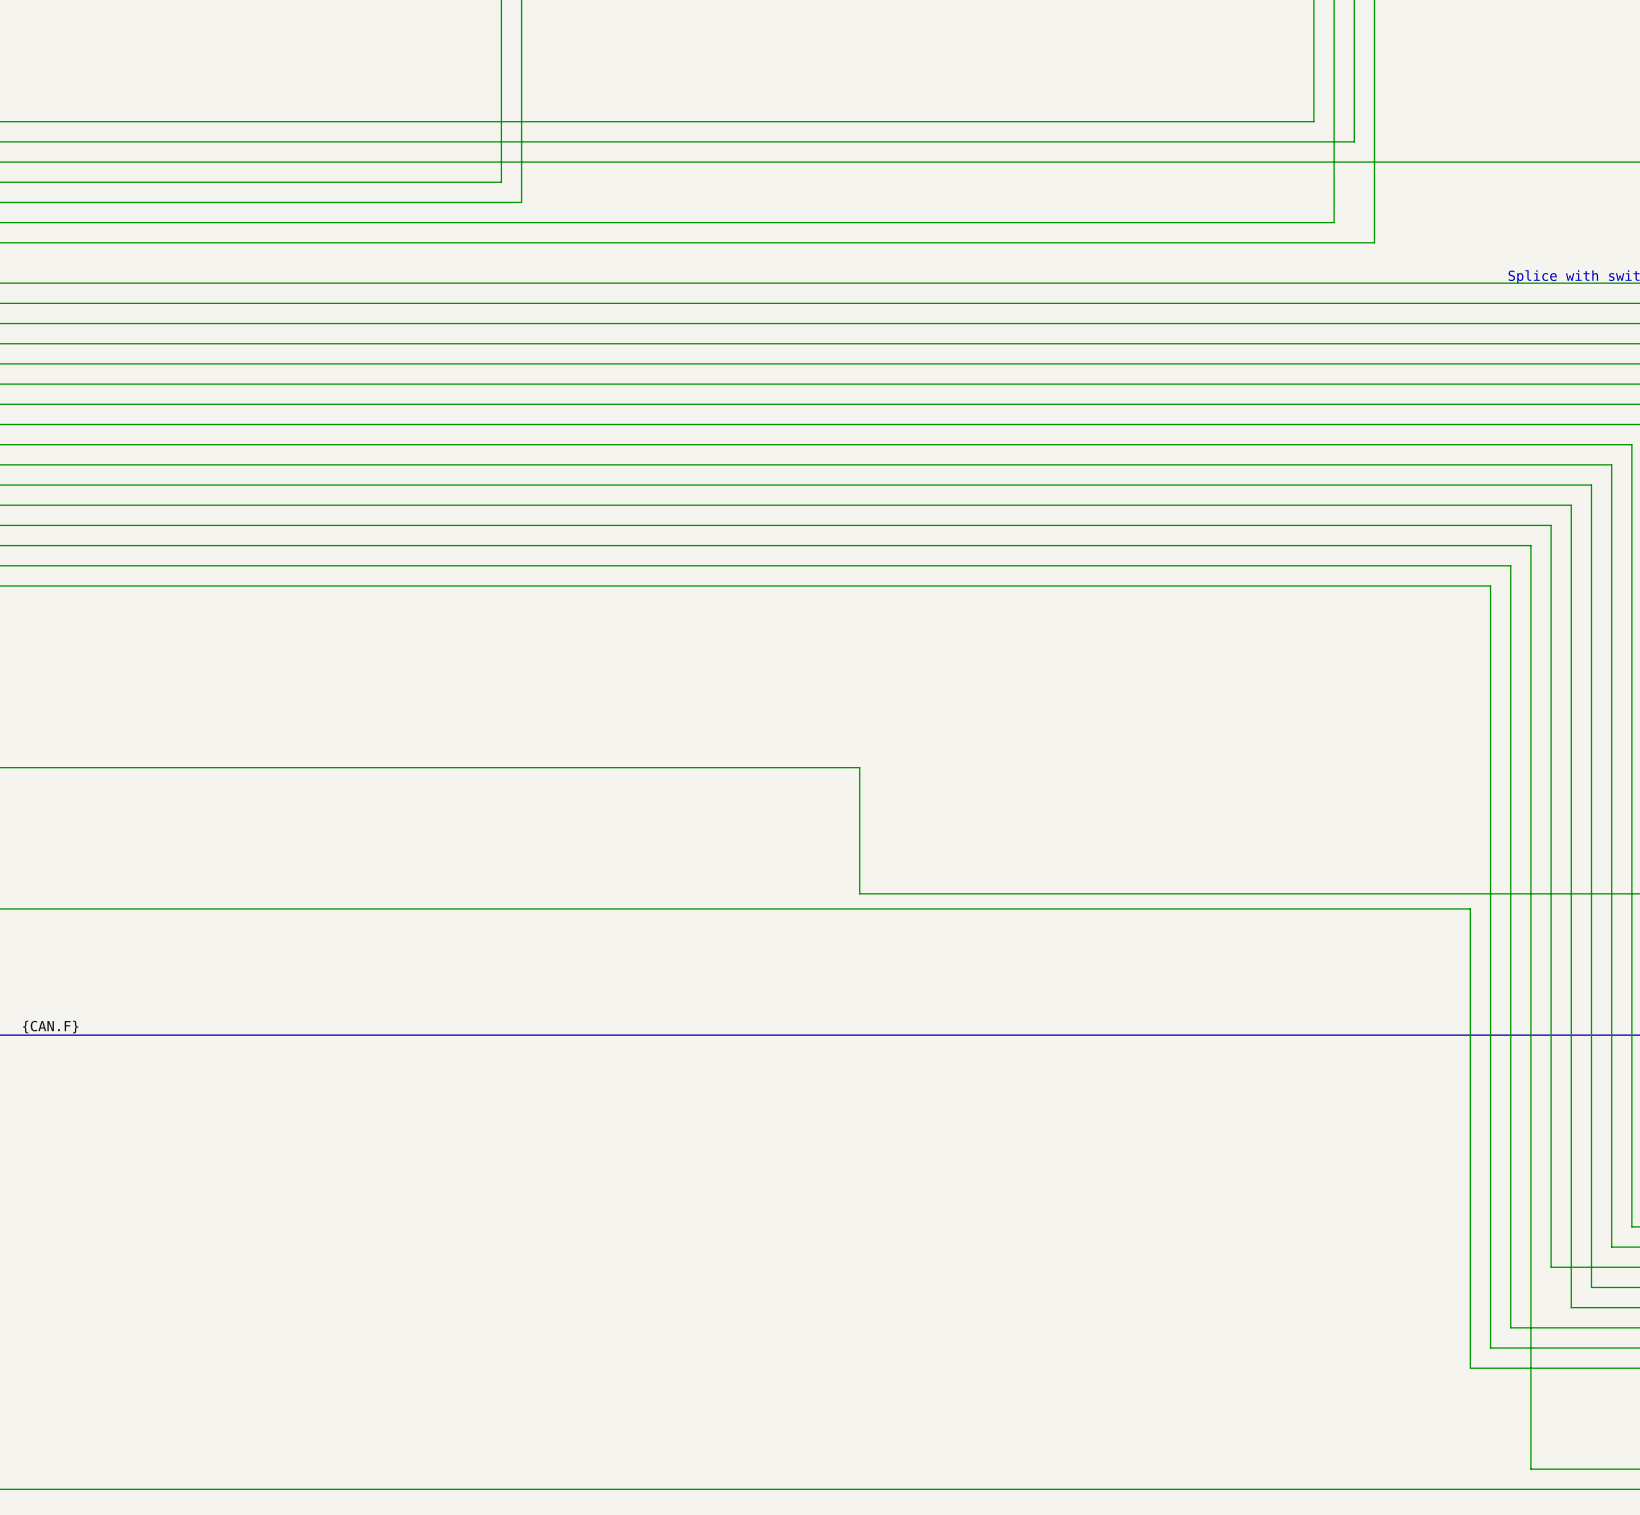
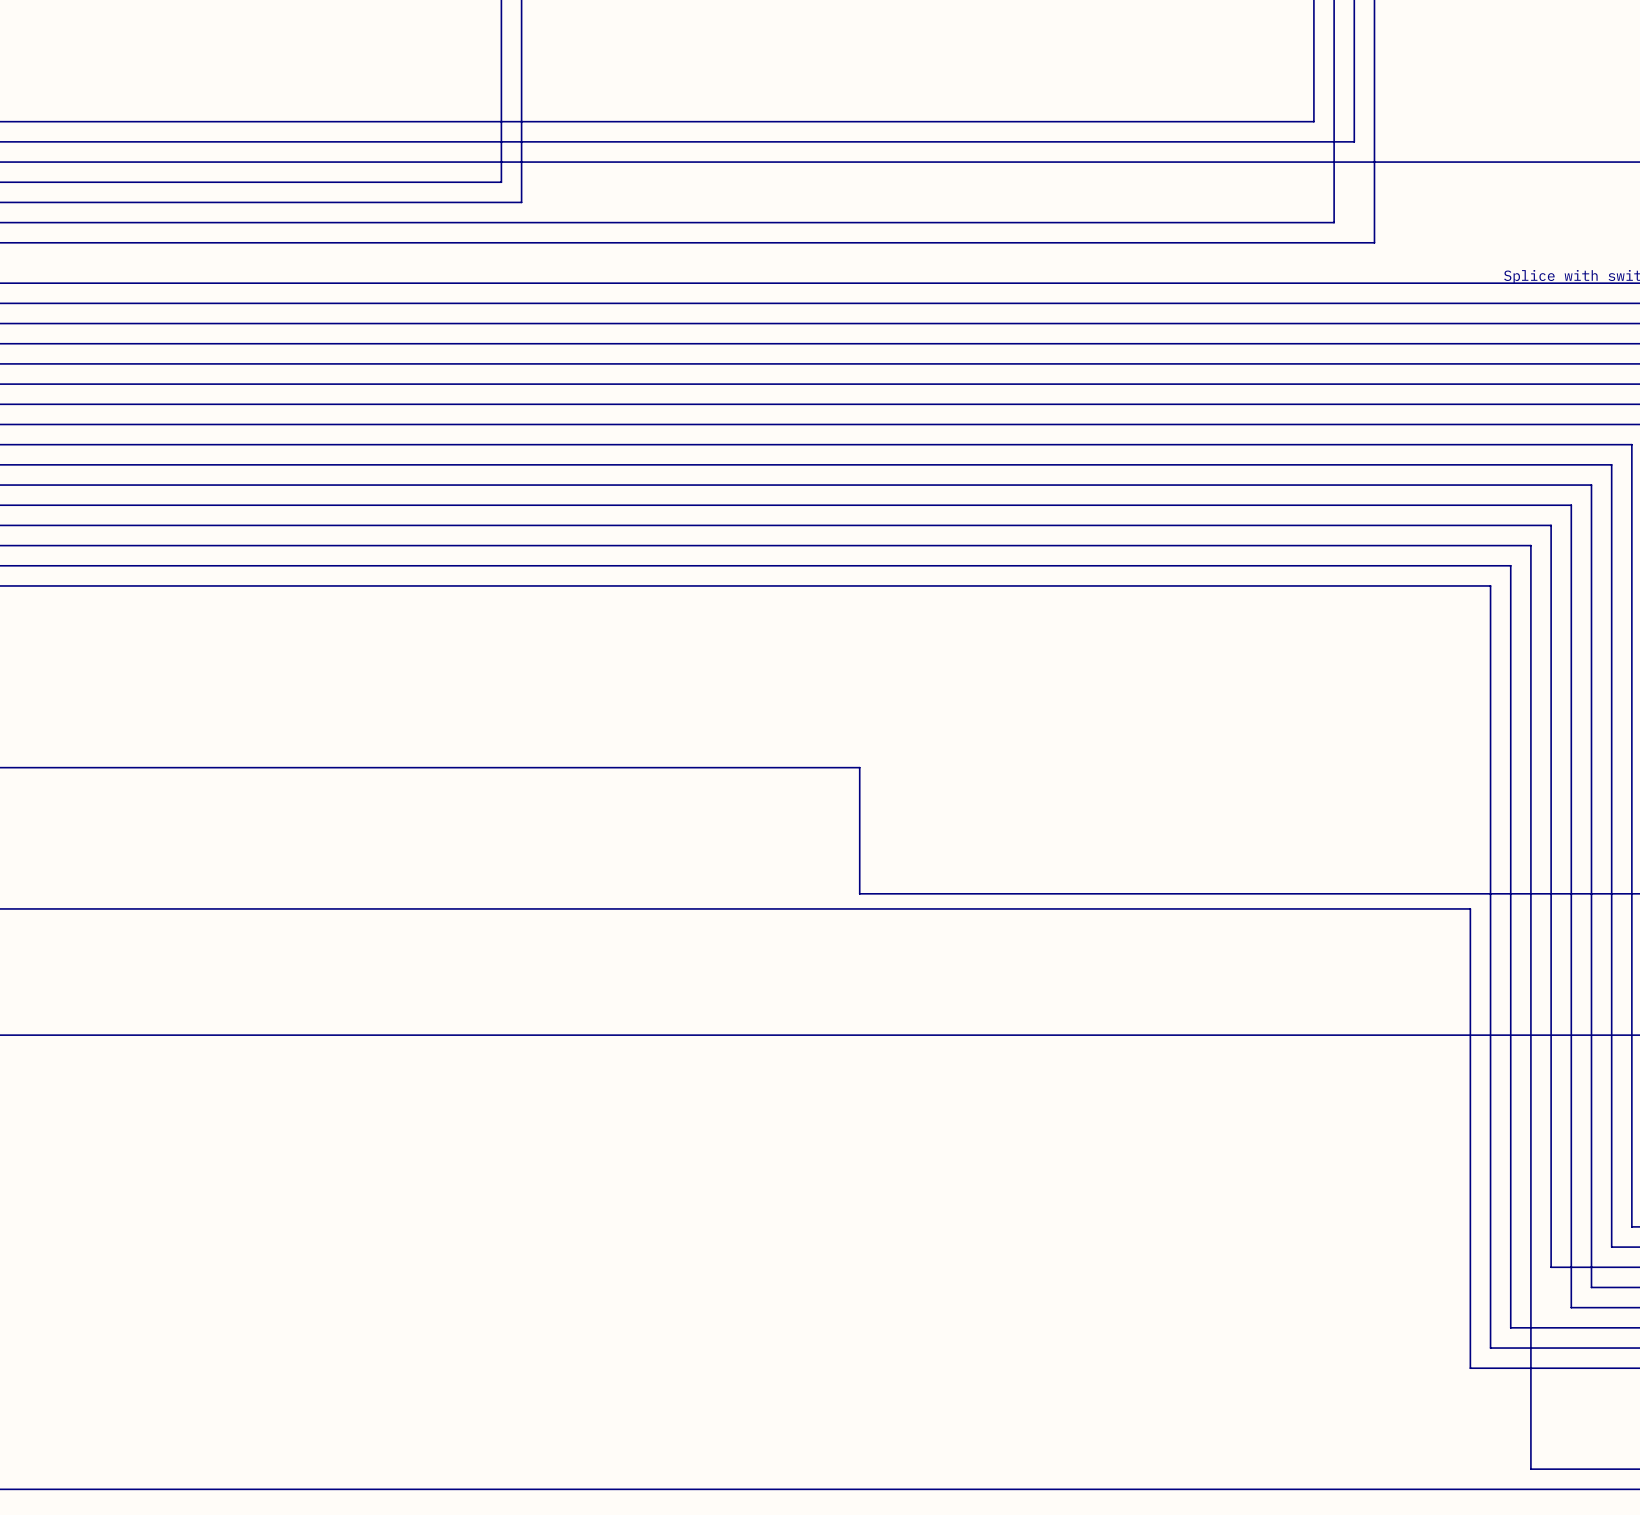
label: {CAN.F} (50, 1027) -> none

